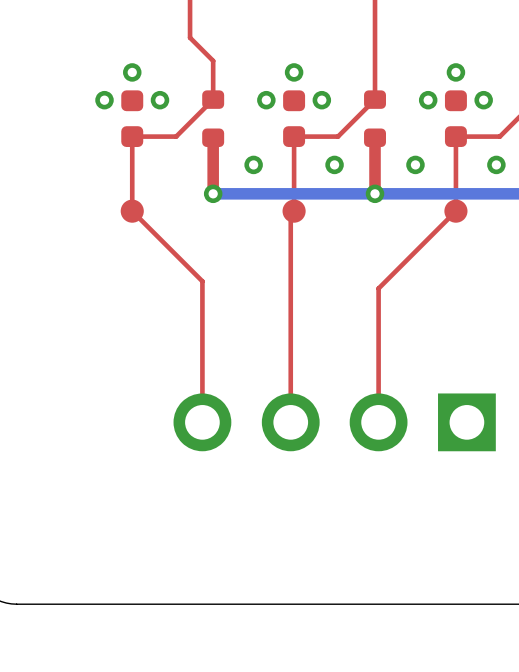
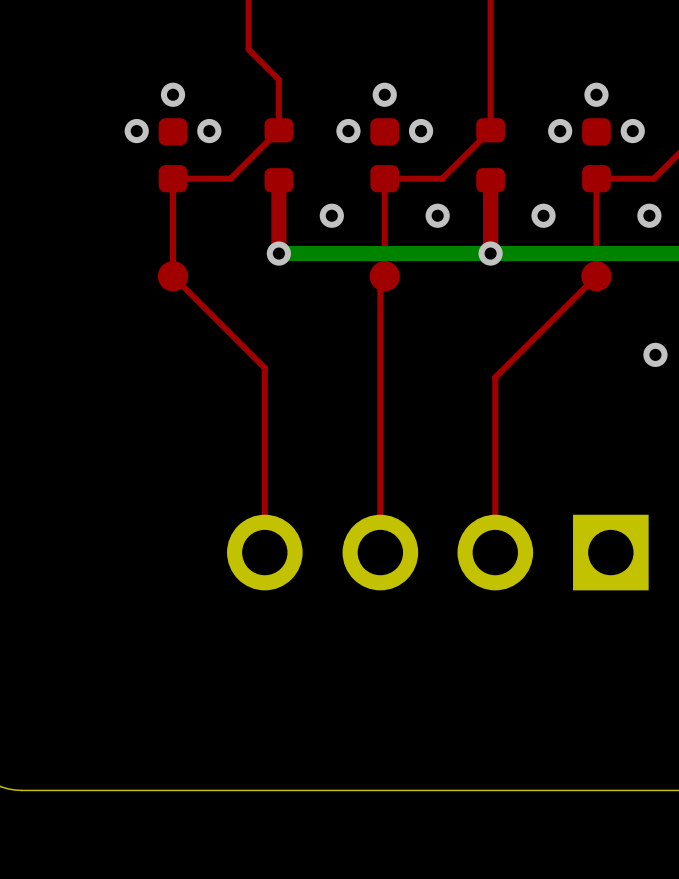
via: none -> (655, 354)

